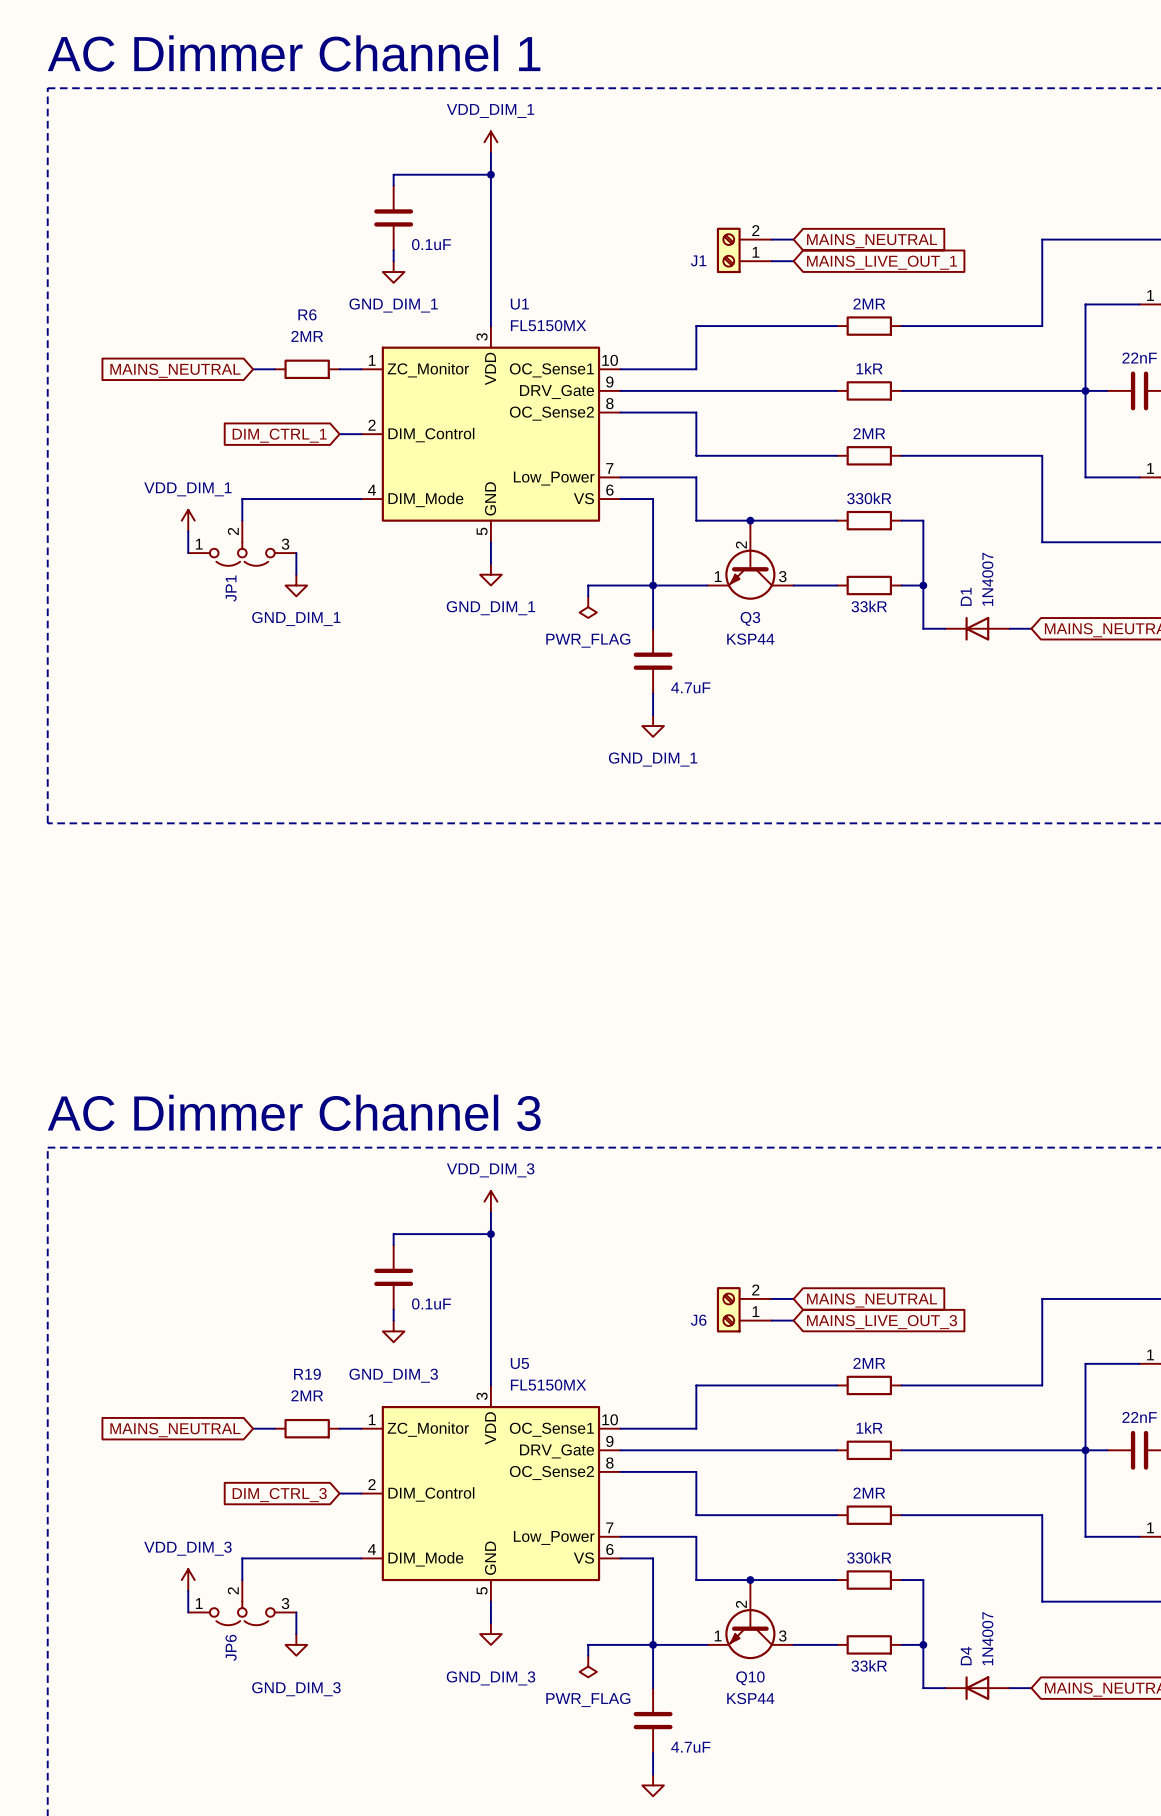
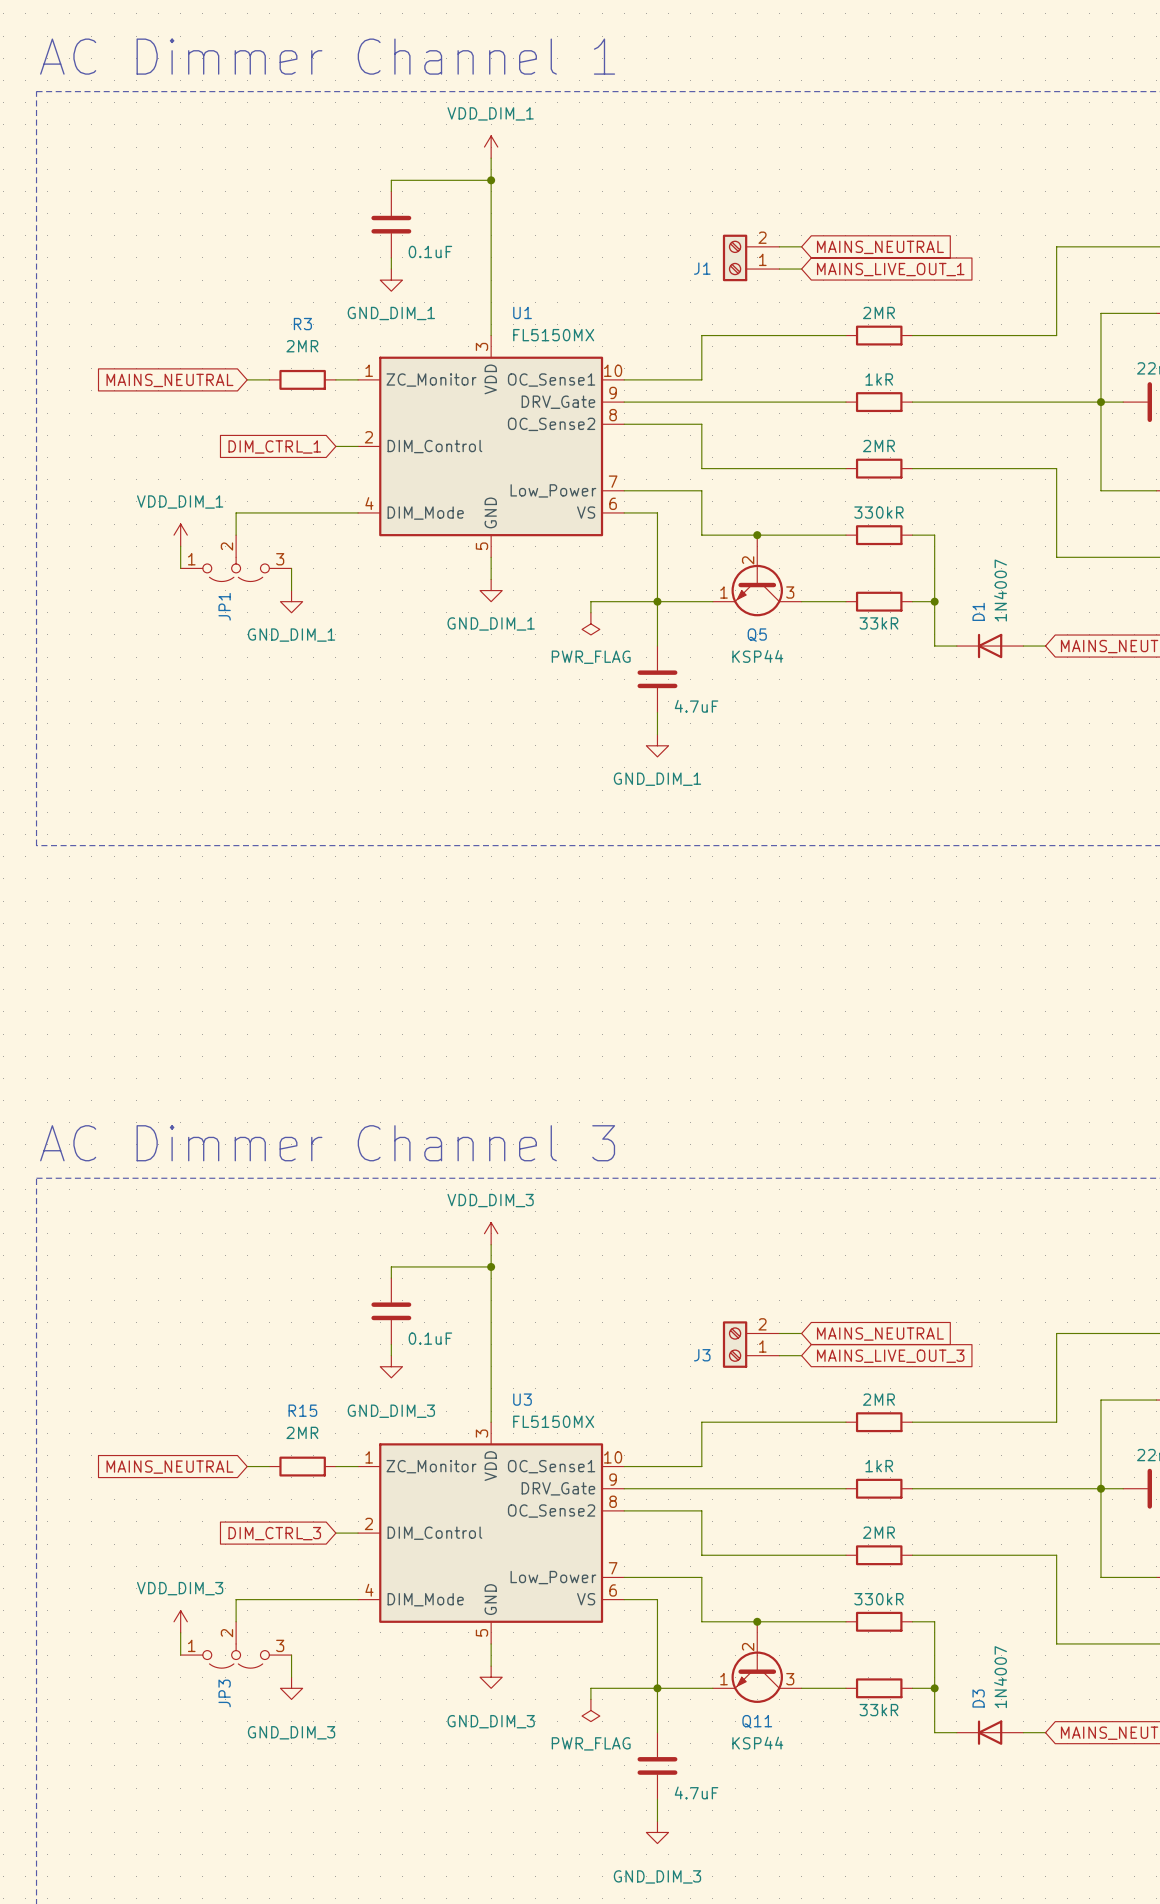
R6 name: R6 (307, 314) -> R3 (302, 324)
Q3 name: Q3 (750, 618) -> Q5 (757, 635)
J6 name: J6 (698, 1320) -> J3 (702, 1355)
U5 name: U5 (519, 1363) -> U3 (522, 1399)
R19 name: R19 (307, 1374) -> R15 (302, 1410)
JP6 name: JP6 (231, 1647) -> JP3 (224, 1693)
D4 name: D4 (966, 1656) -> D3 (978, 1698)
Q10 name: Q10 (750, 1678) -> Q11 (757, 1721)

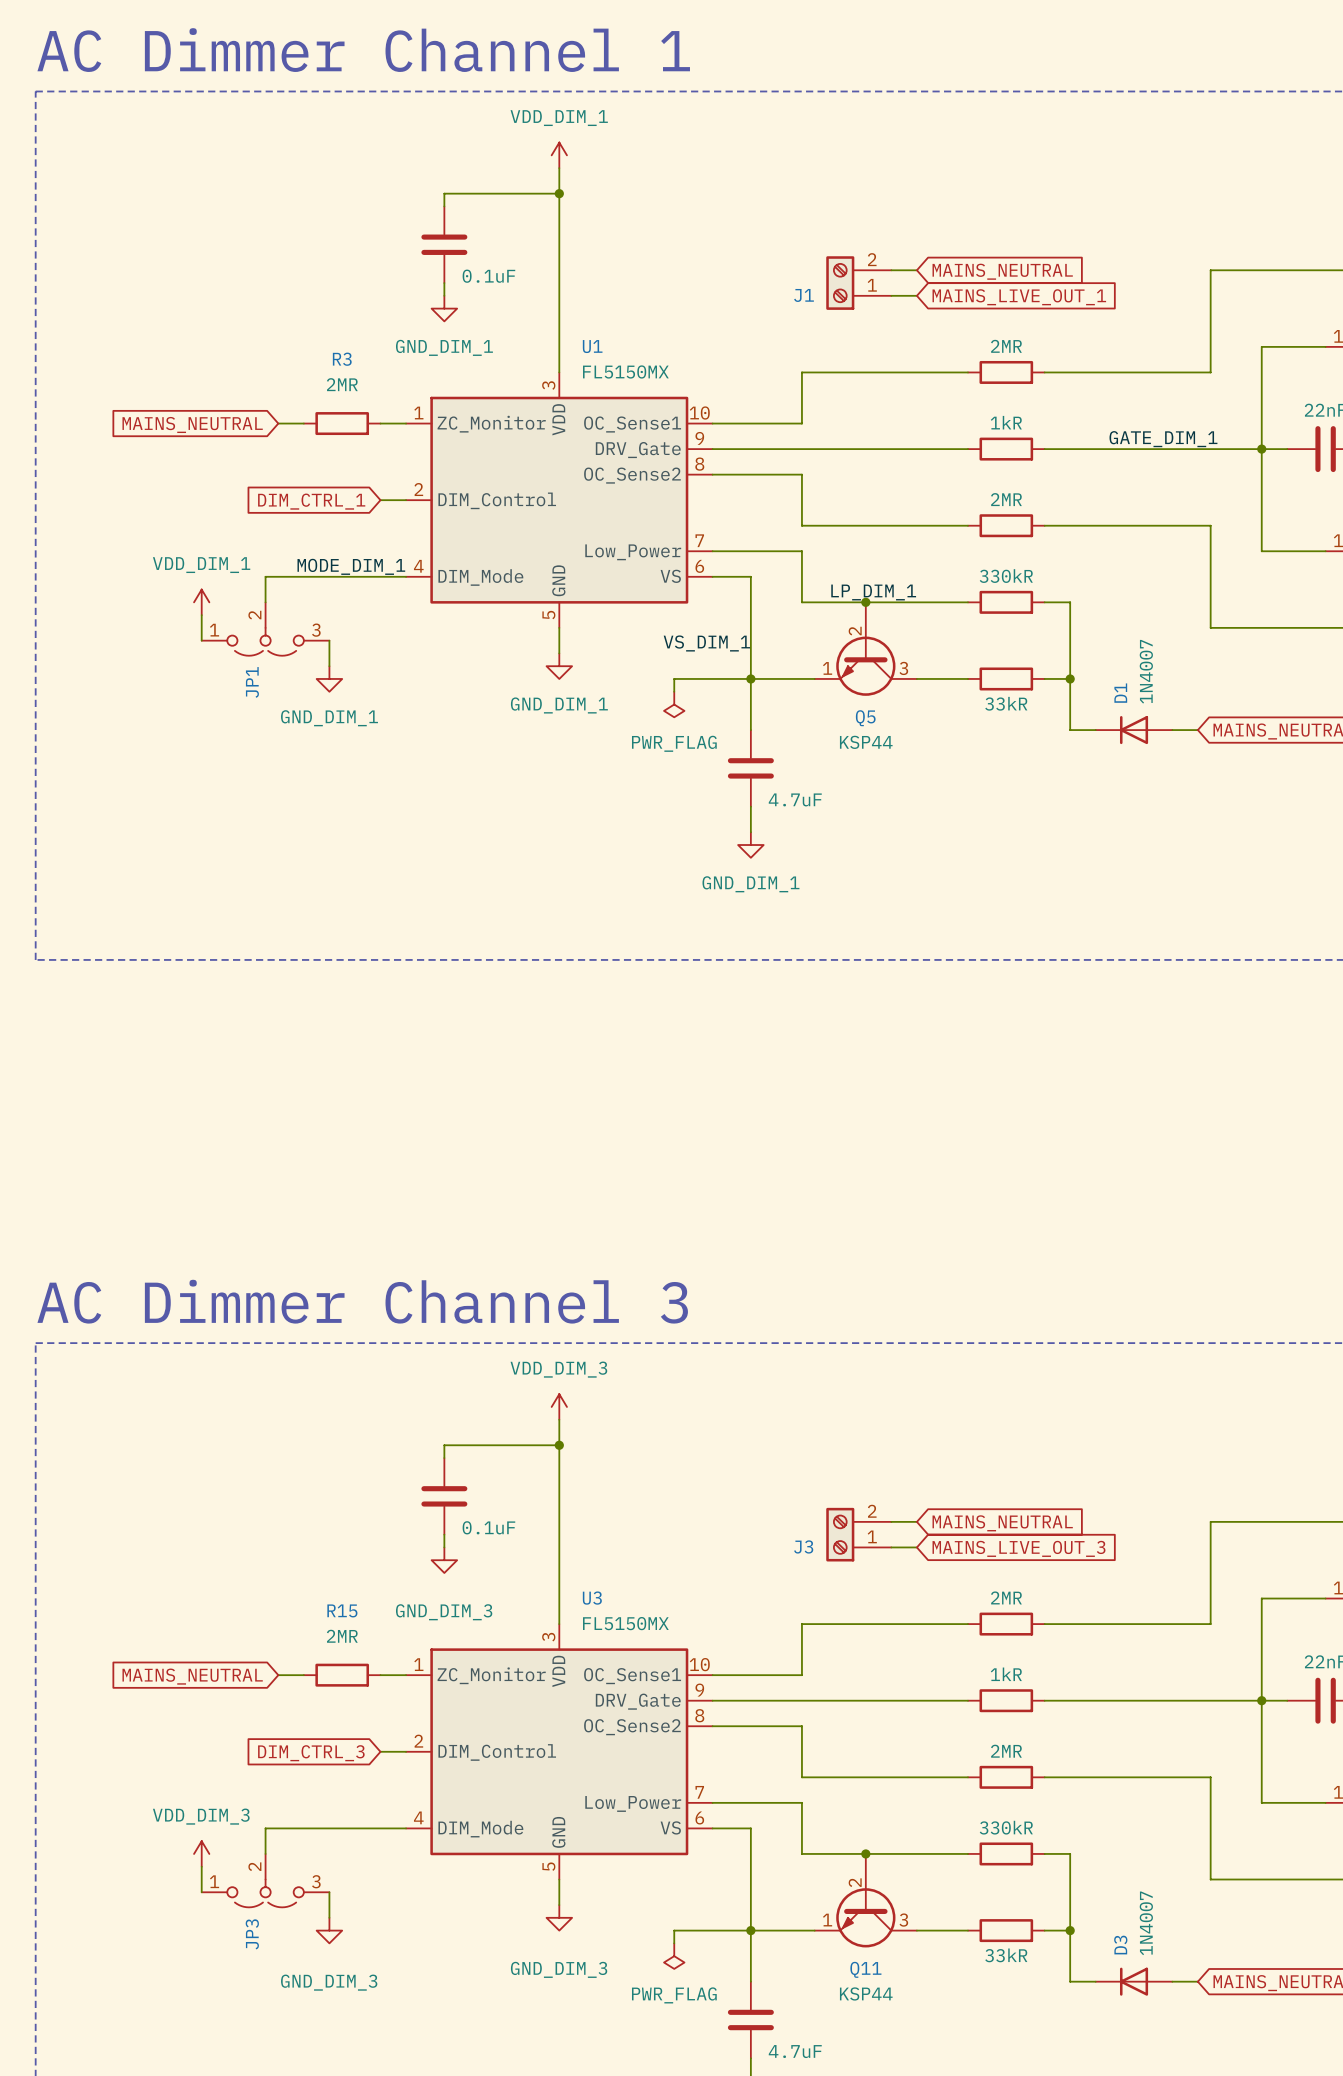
label: none -> GATE_DIM_1 (1163, 439)
label: none -> MODE_DIM_1 (351, 566)
label: none -> LP_DIM_1 (873, 592)
label: none -> VS_DIM_1 (706, 643)

